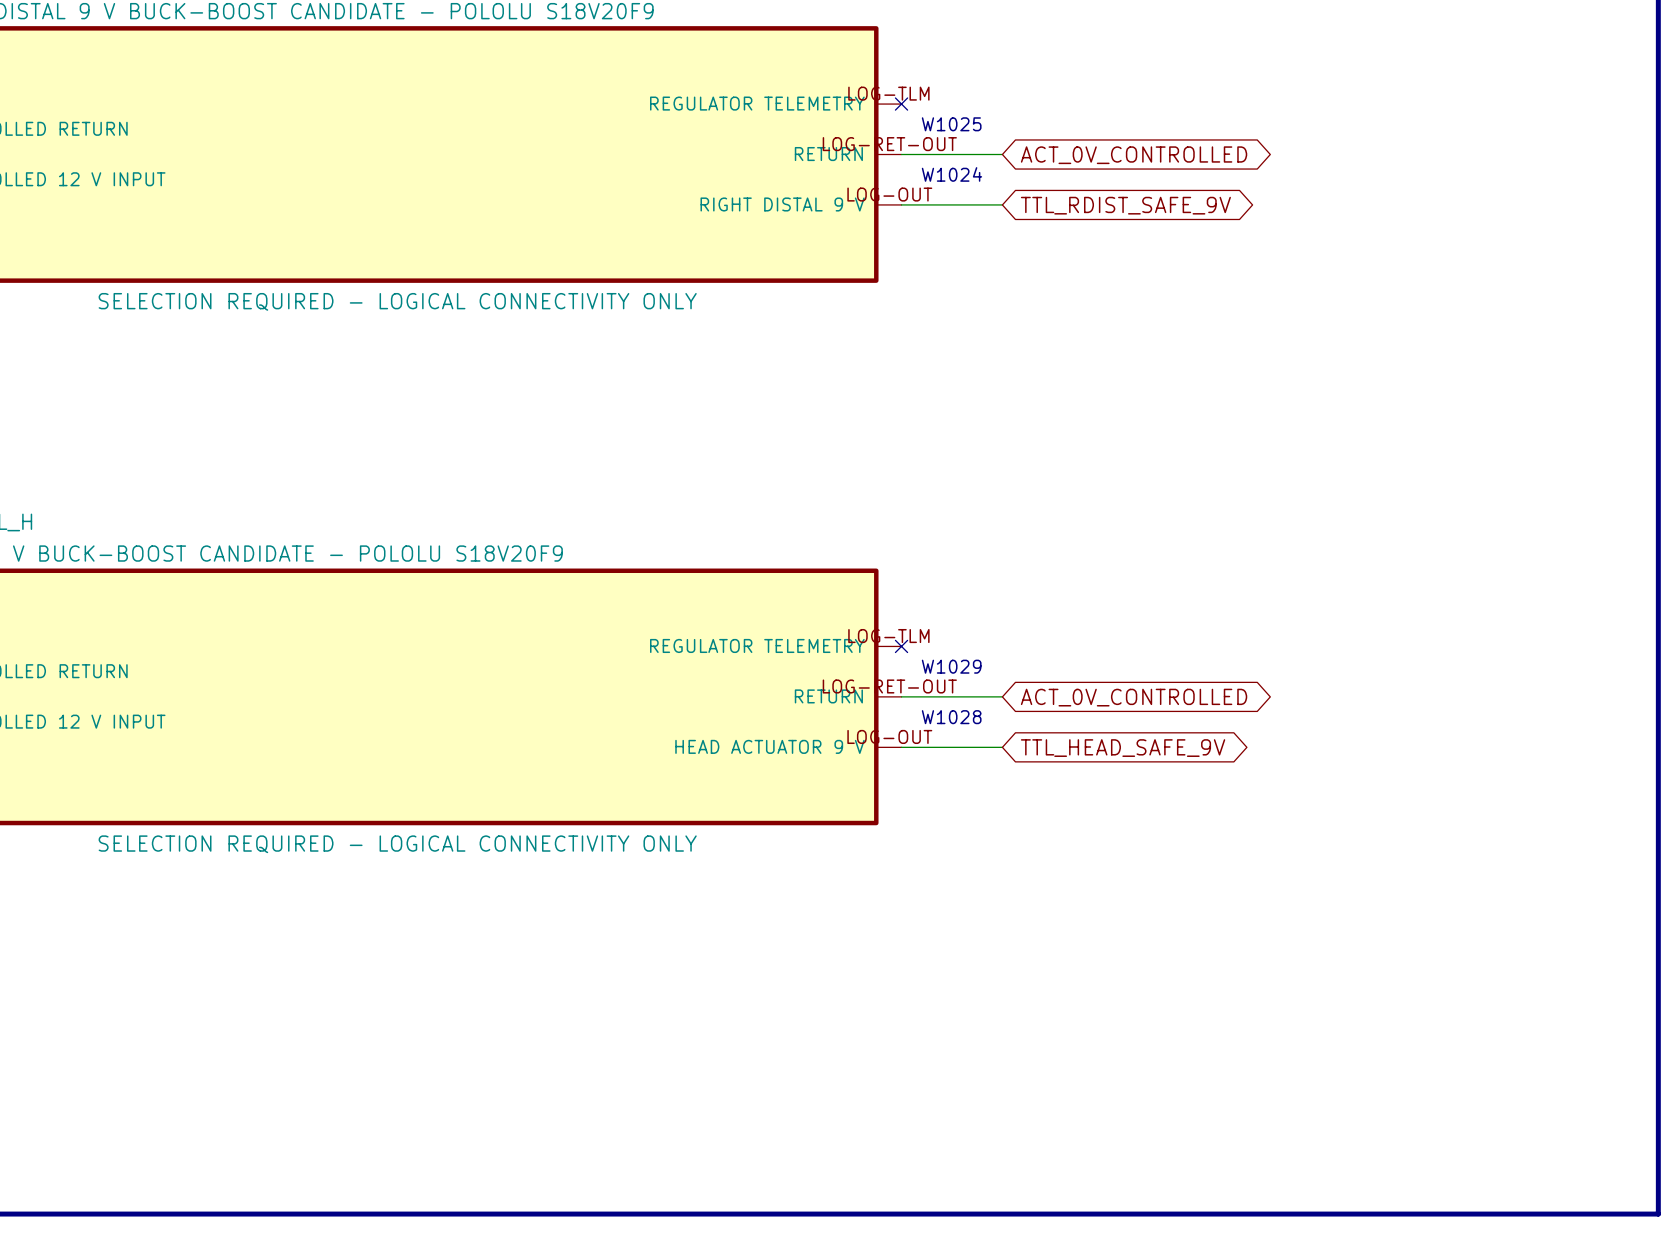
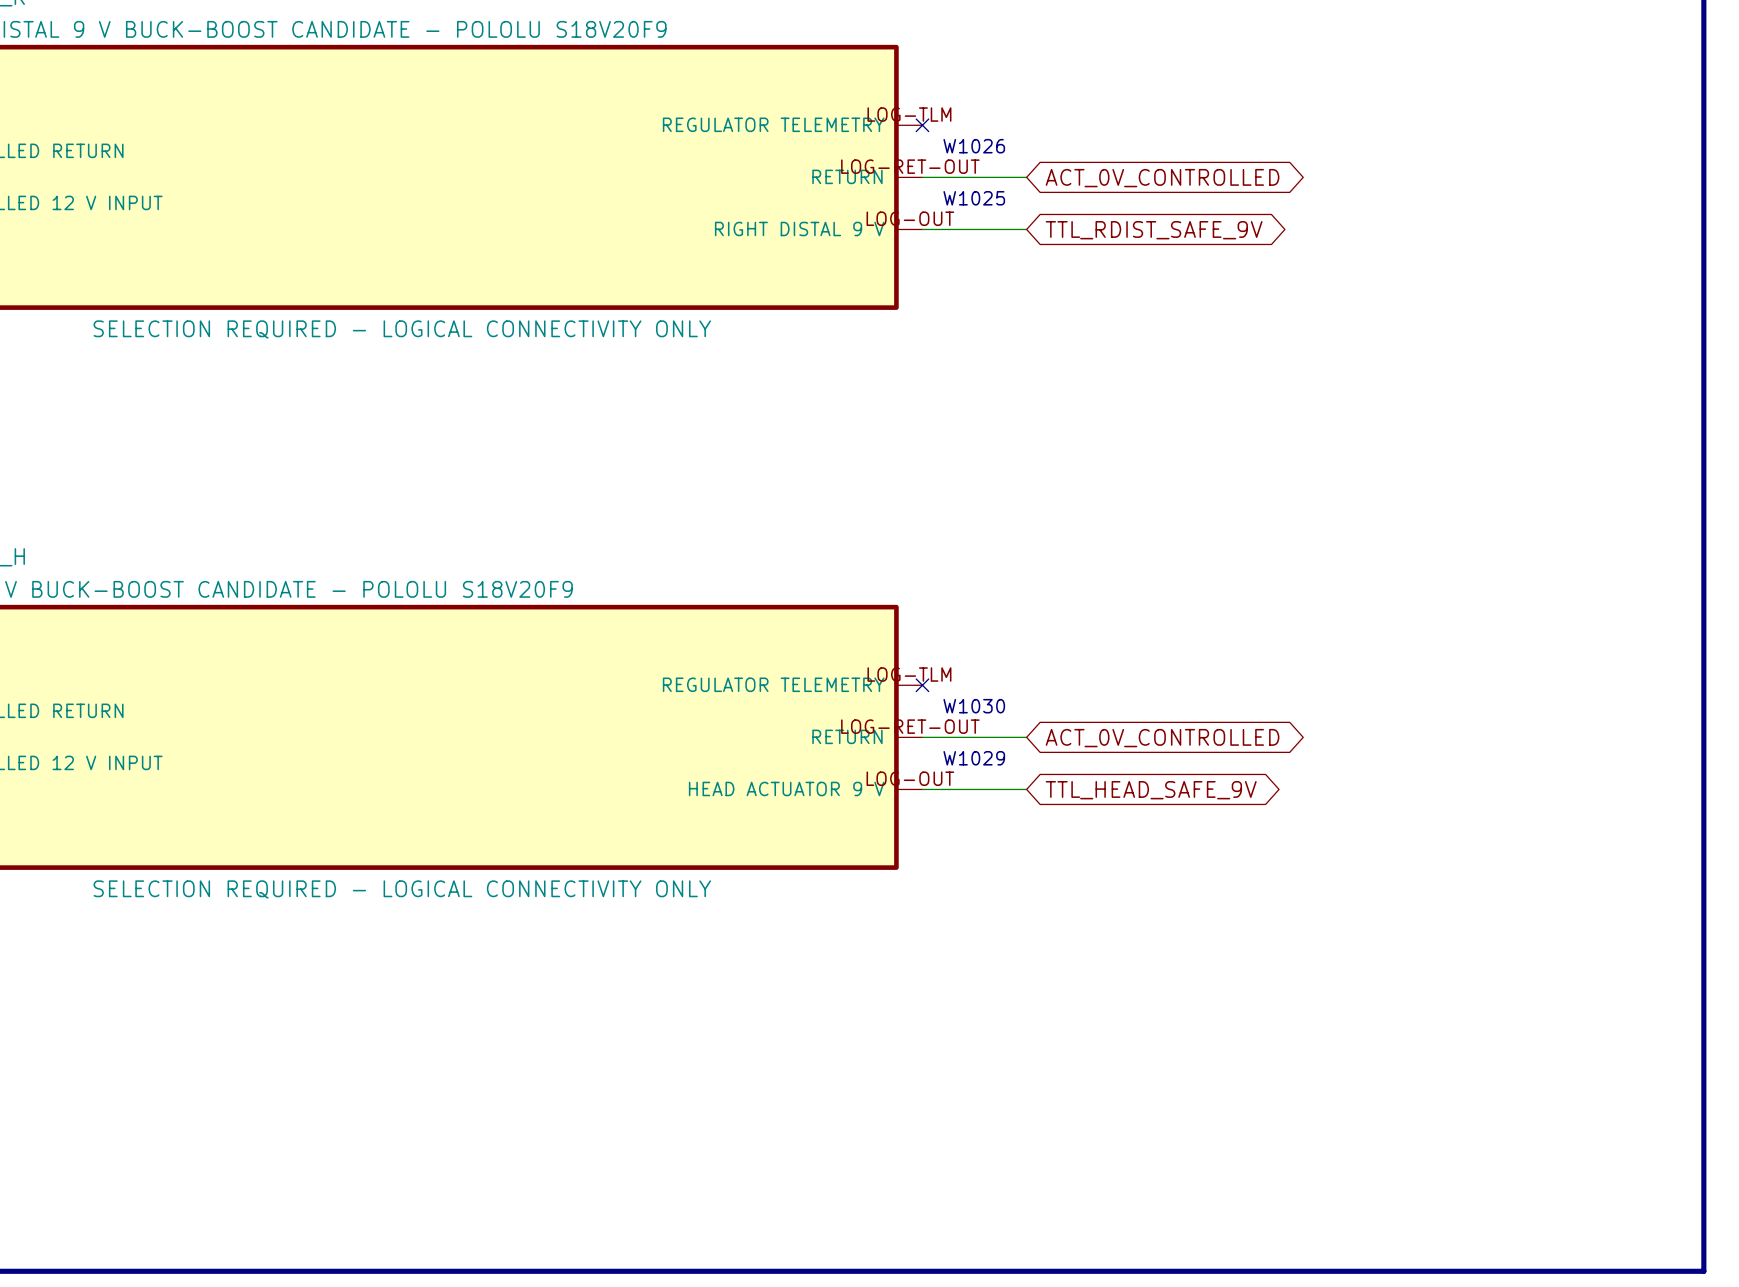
text: W1025 (951, 124) -> W1026 (974, 146)
text: W1024 (951, 174) -> W1025 (974, 198)
text: W1029 (951, 666) -> W1030 (974, 706)
text: W1028 (951, 717) -> W1029 (974, 758)

